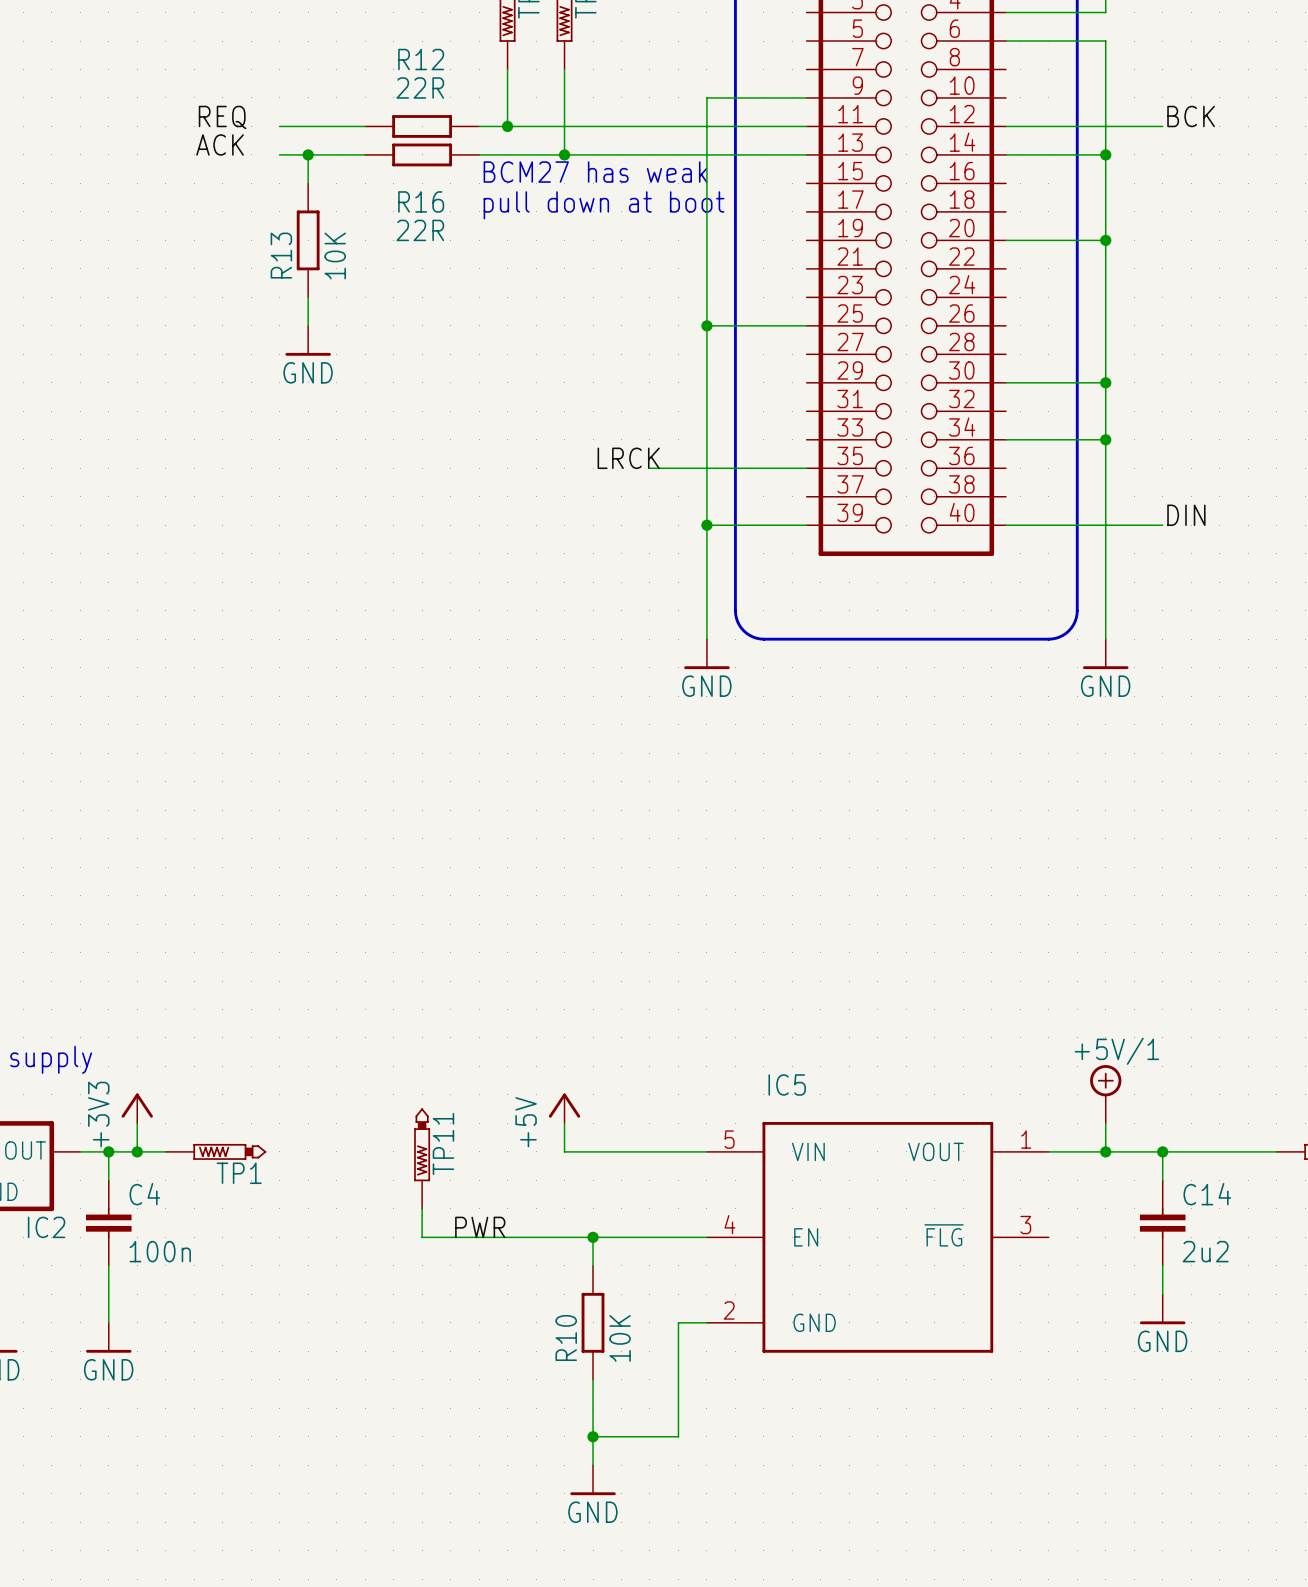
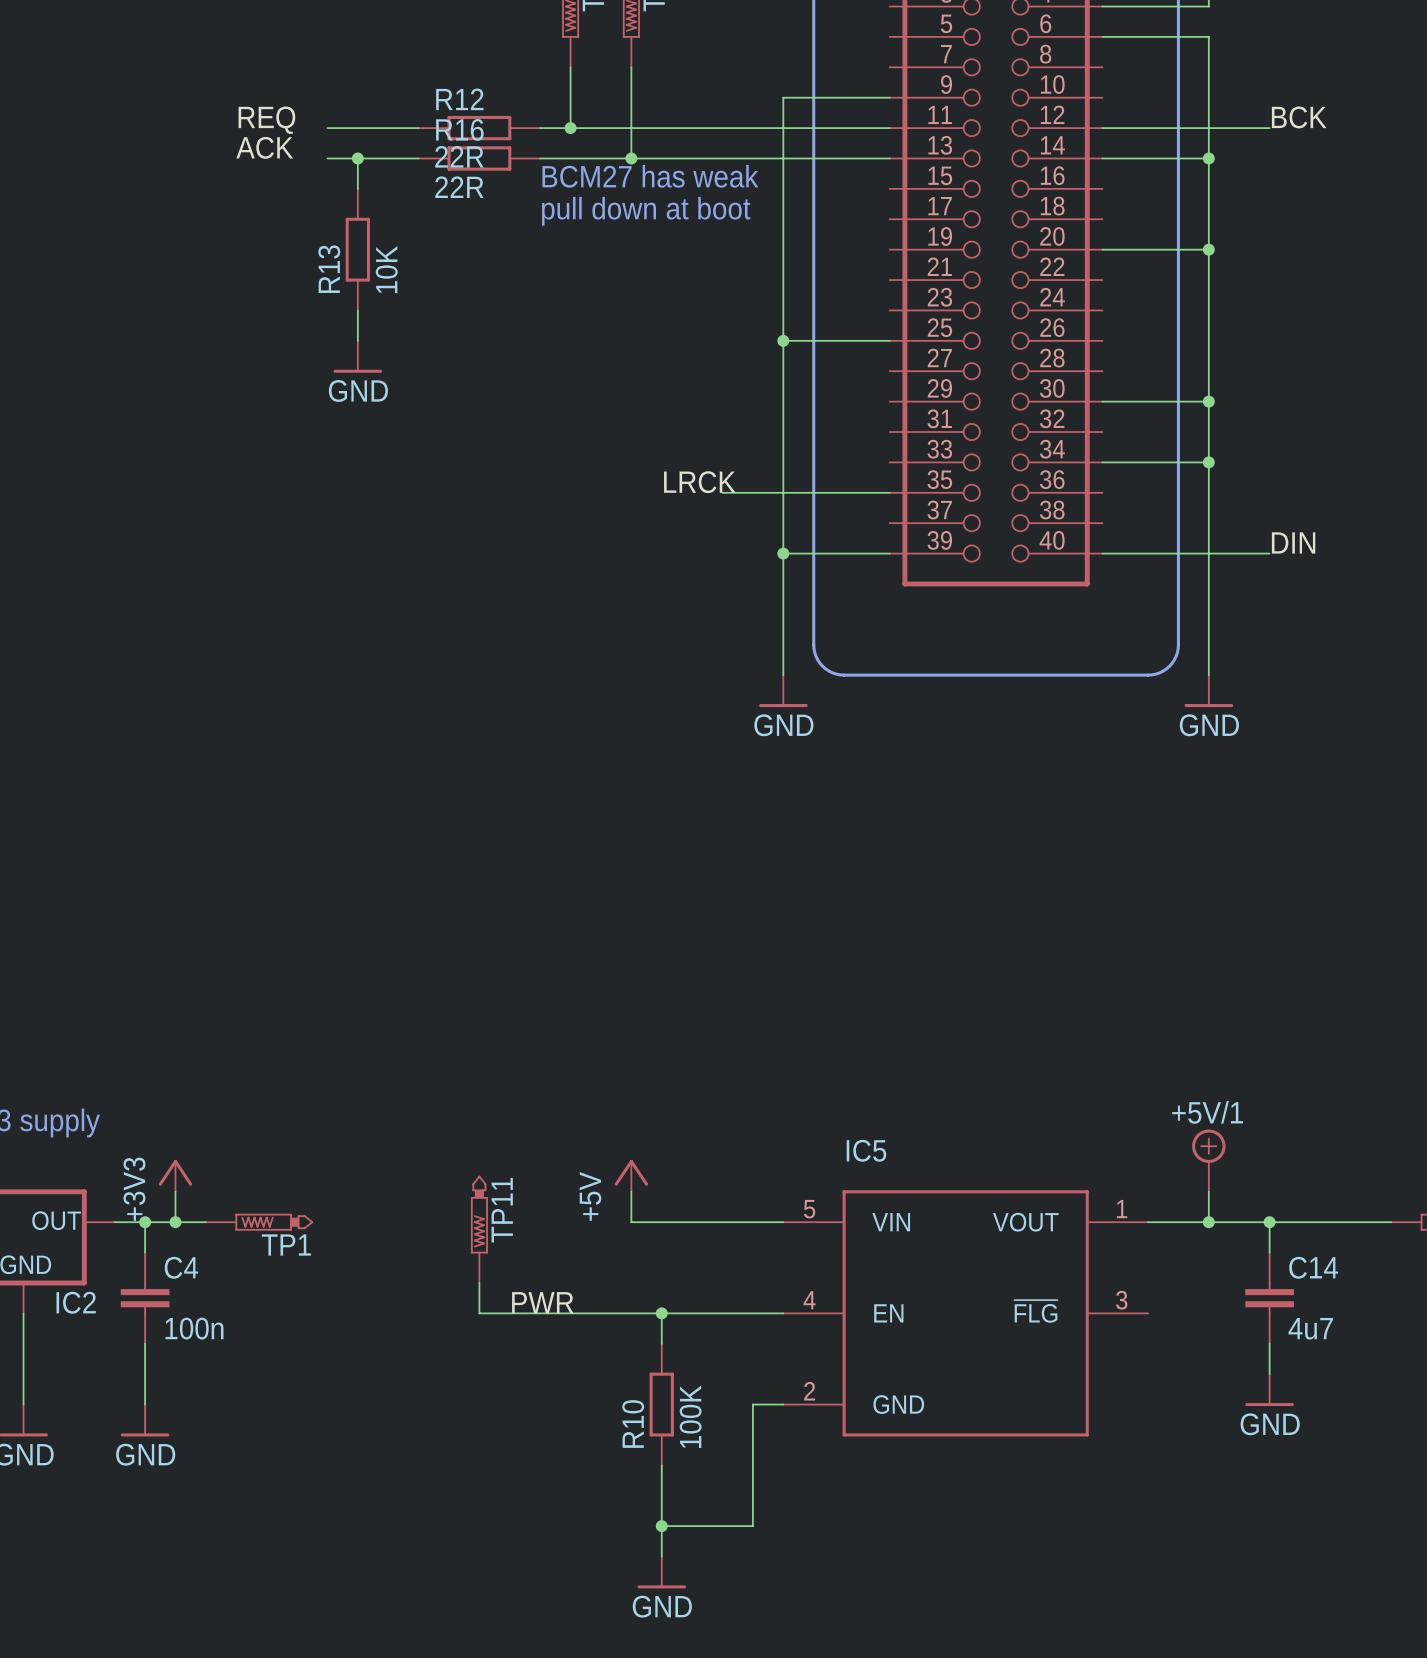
R12 name position: R12 (421, 59) -> R12 (459, 99)
R12 value position: 22R (420, 88) -> 22R (459, 156)
R16 name position: R16 (421, 201) -> R16 (459, 129)
R16 value position: 22R (420, 230) -> 22R (459, 187)
C14 value: 2u2 (1205, 1251) -> 4u7 (1310, 1328)
R10 value: 10K (620, 1338) -> 100K (690, 1416)

